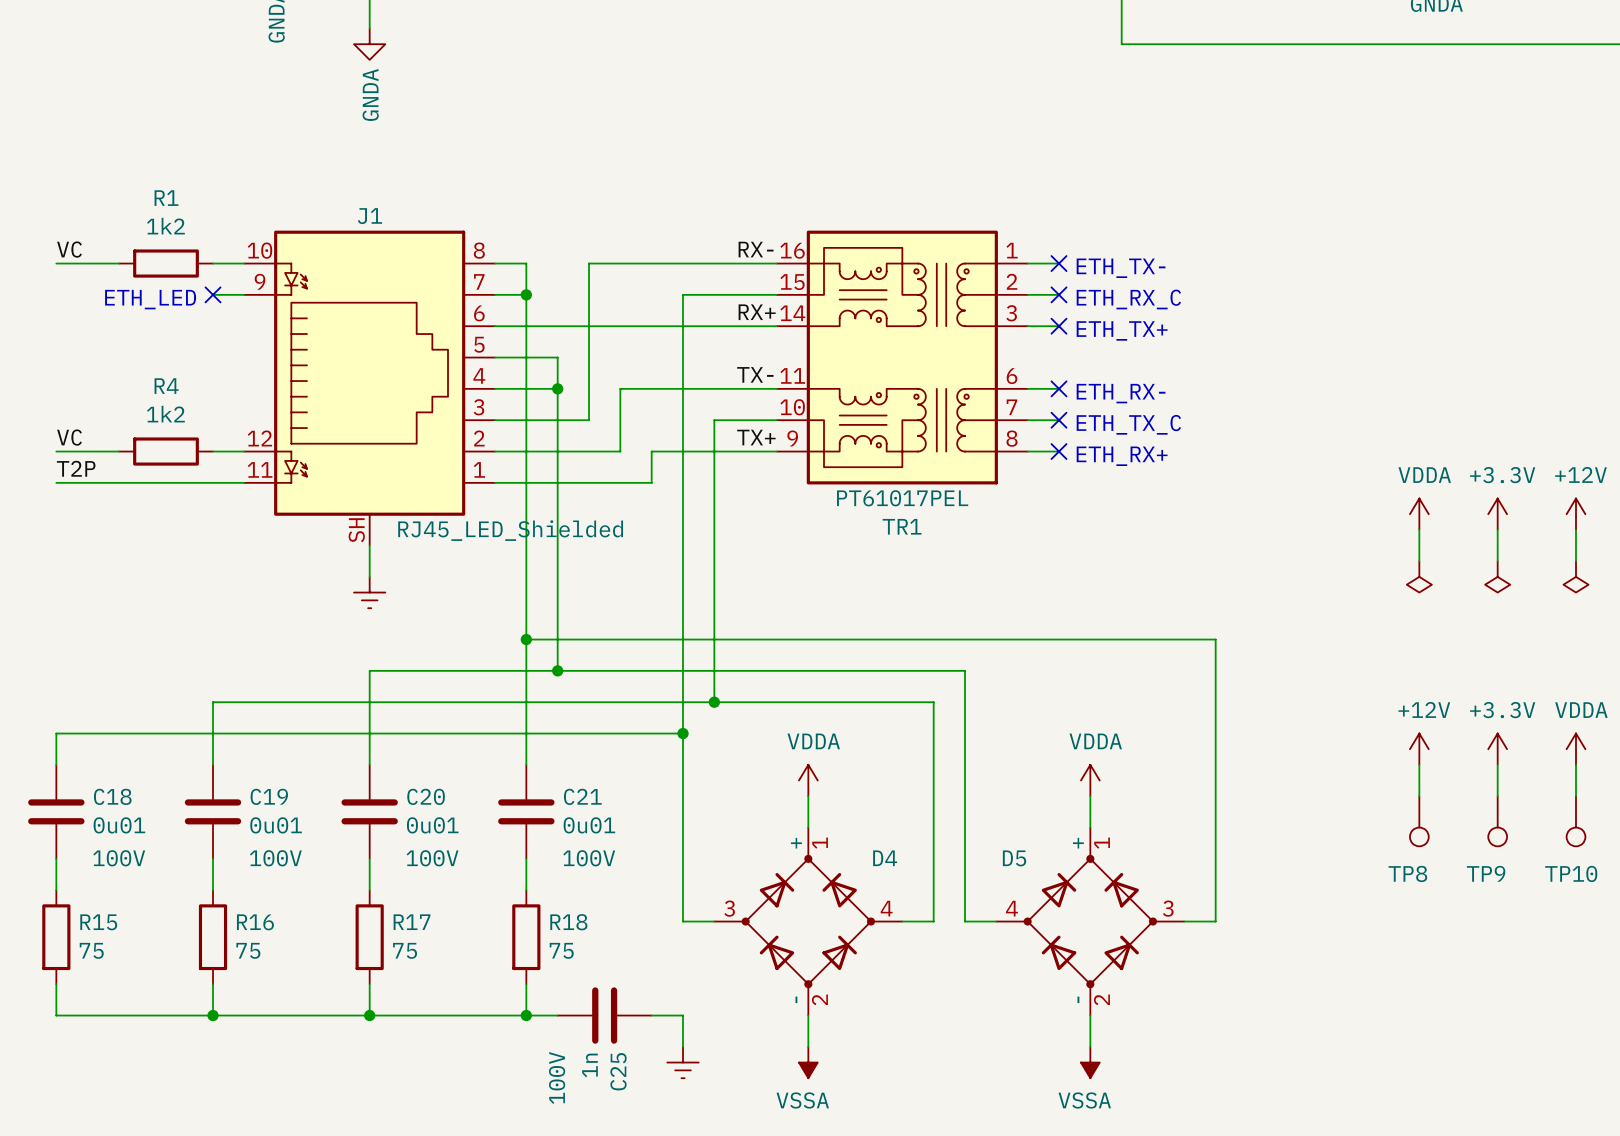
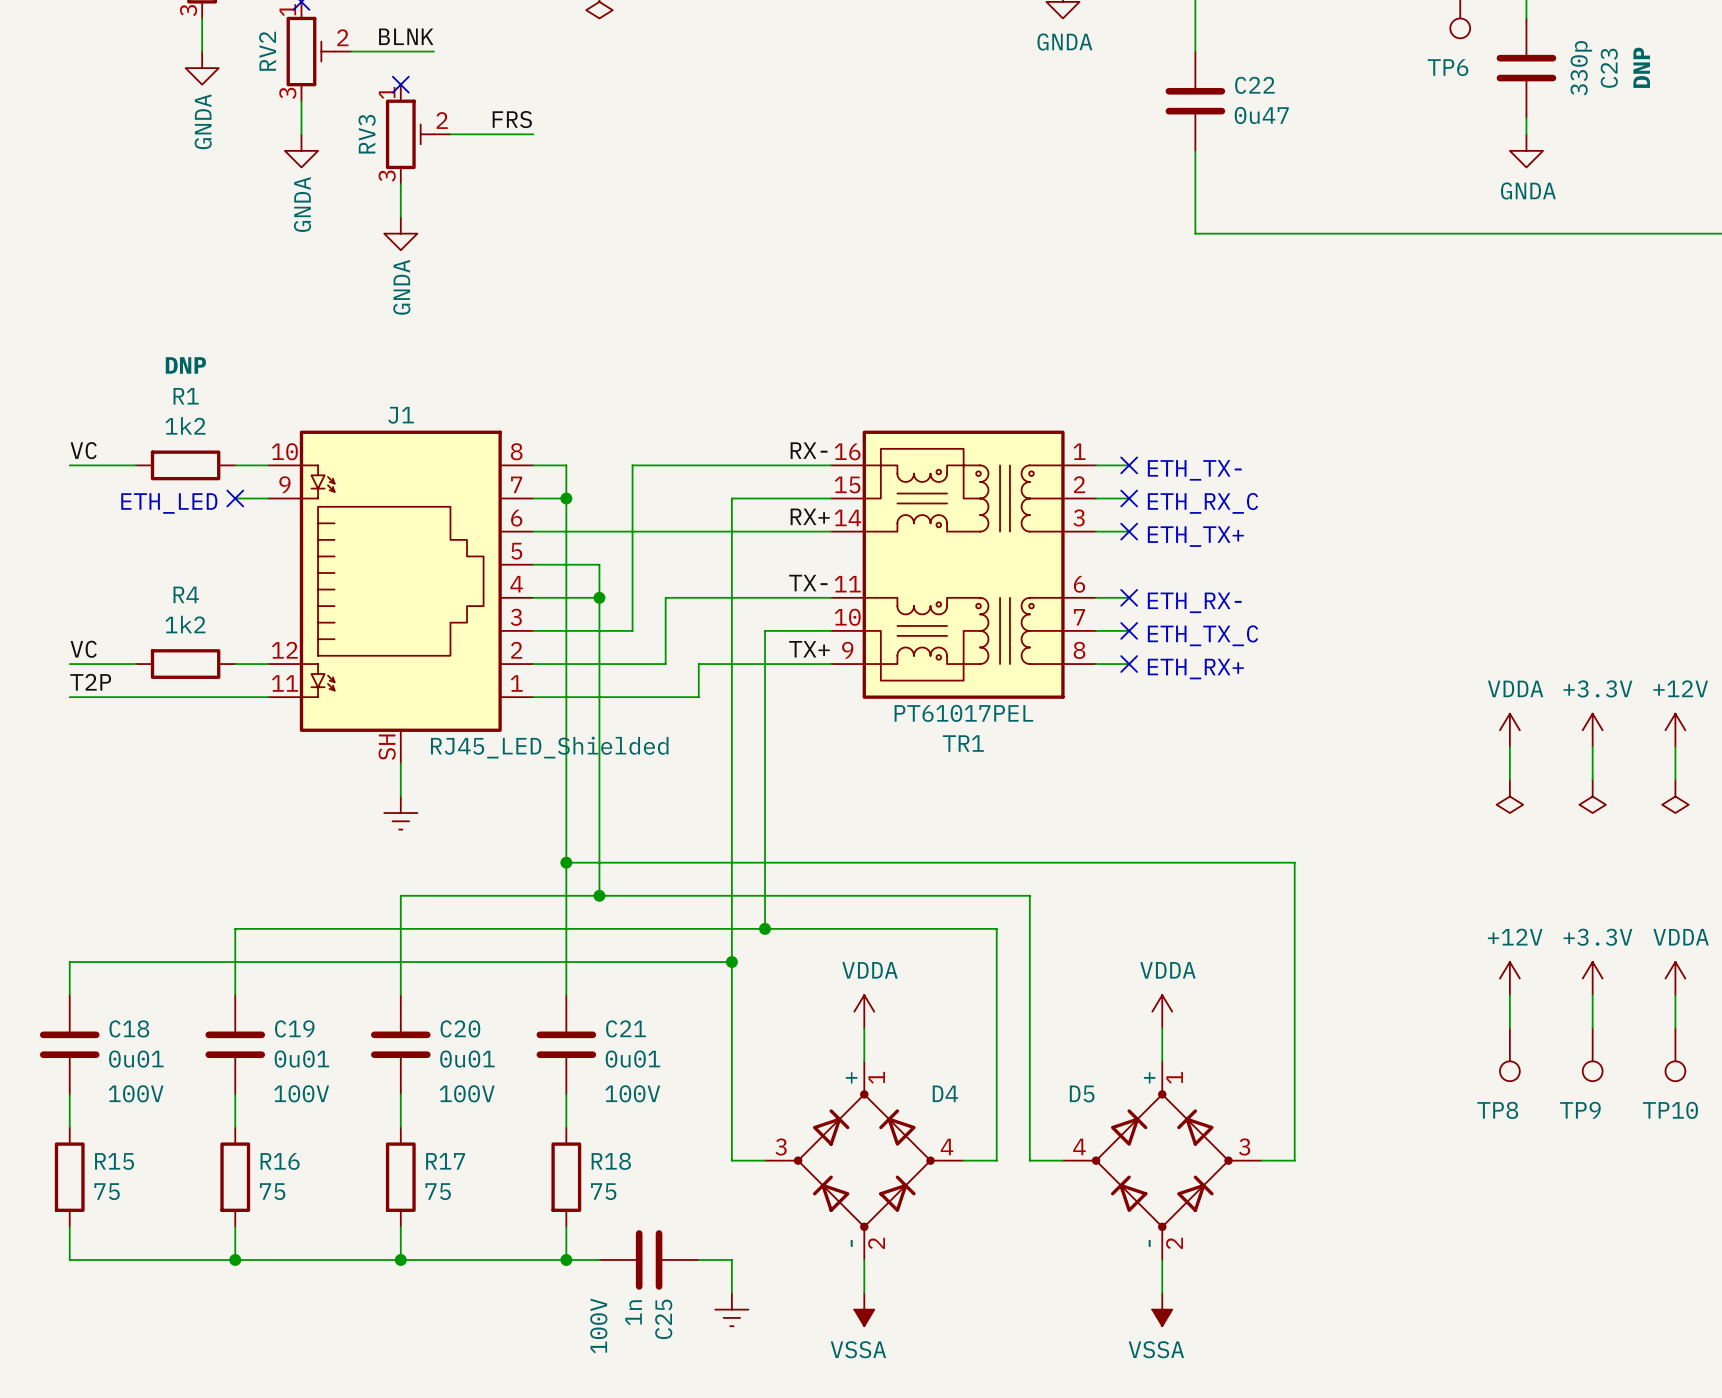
R1 text: none -> DNP (185, 365)

